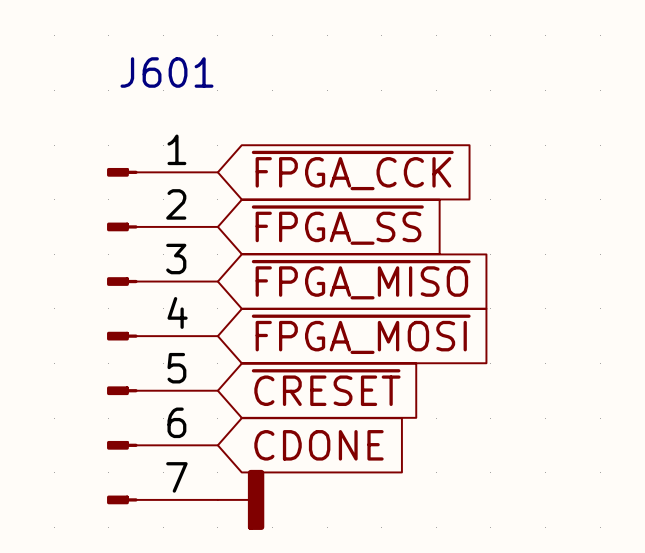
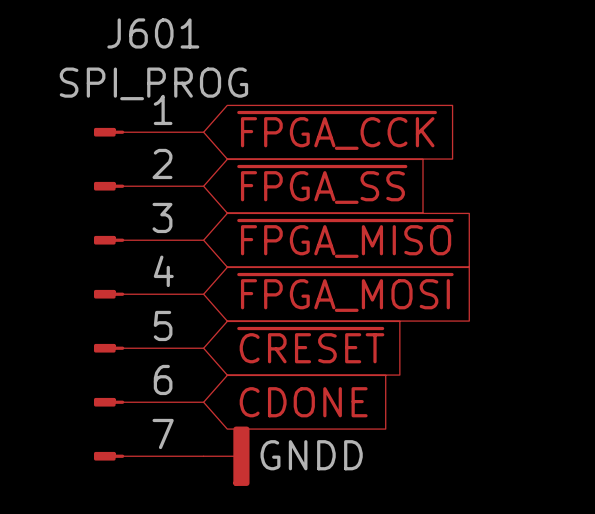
J601 value: none -> SPI_PROG (153, 83)
power symbol text: none -> GNDD (311, 455)

